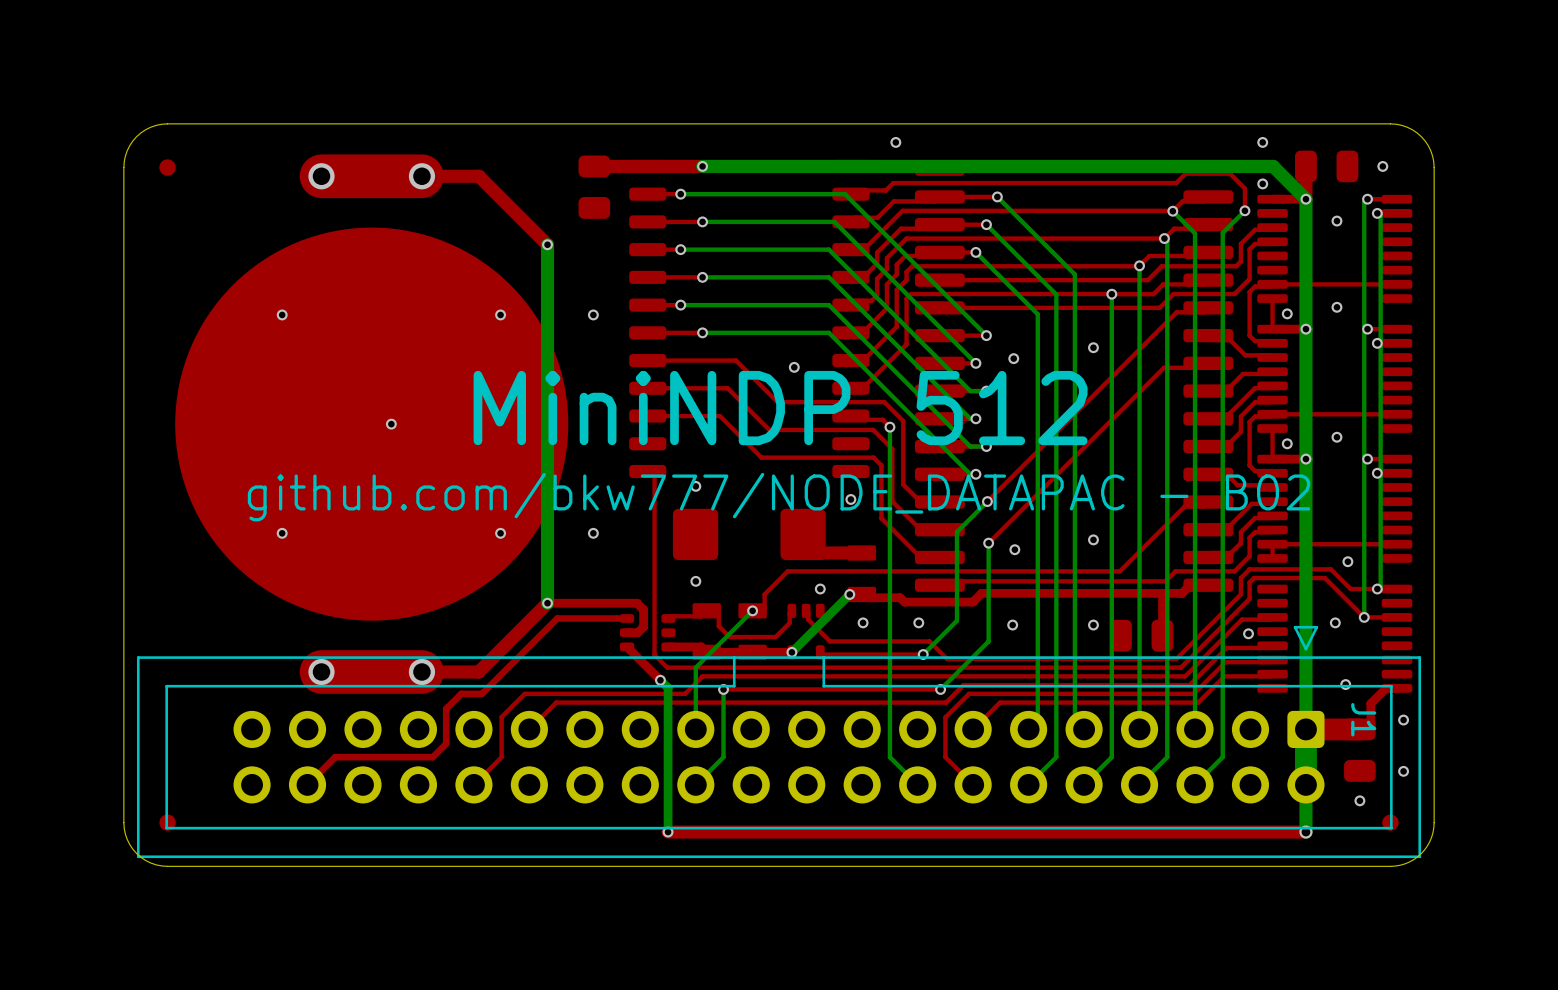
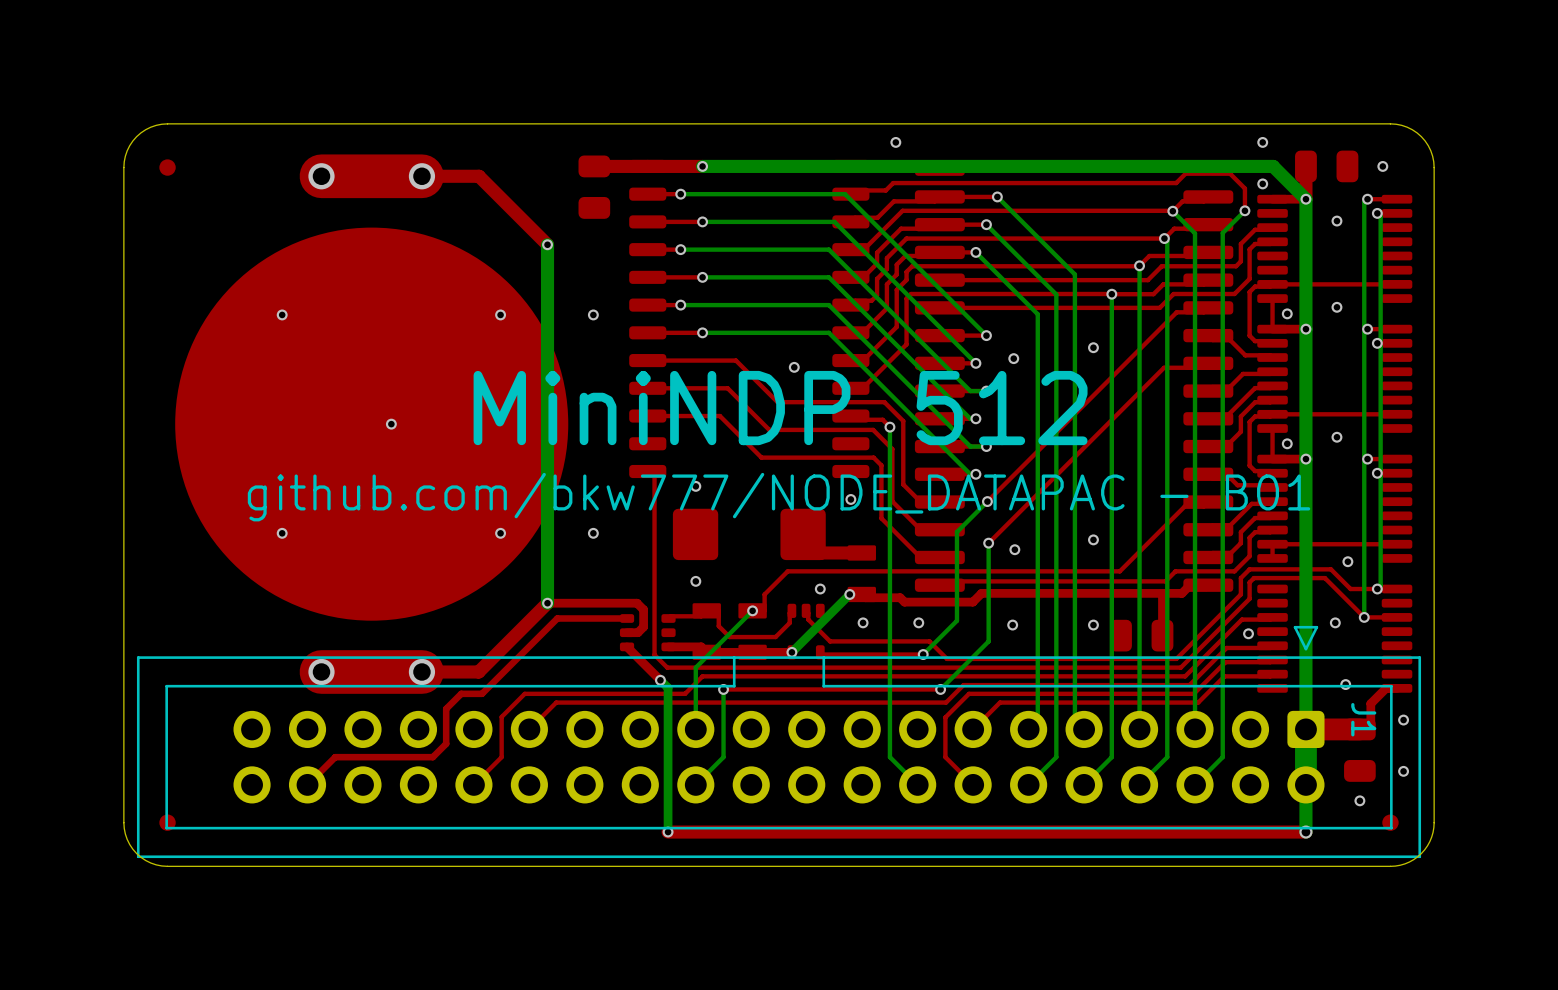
text: github.com/bkw777/NODE_DATAPAC - B02 (779, 497) -> github.com/bkw777/NODE_DATAPAC - B01 (779, 497)

